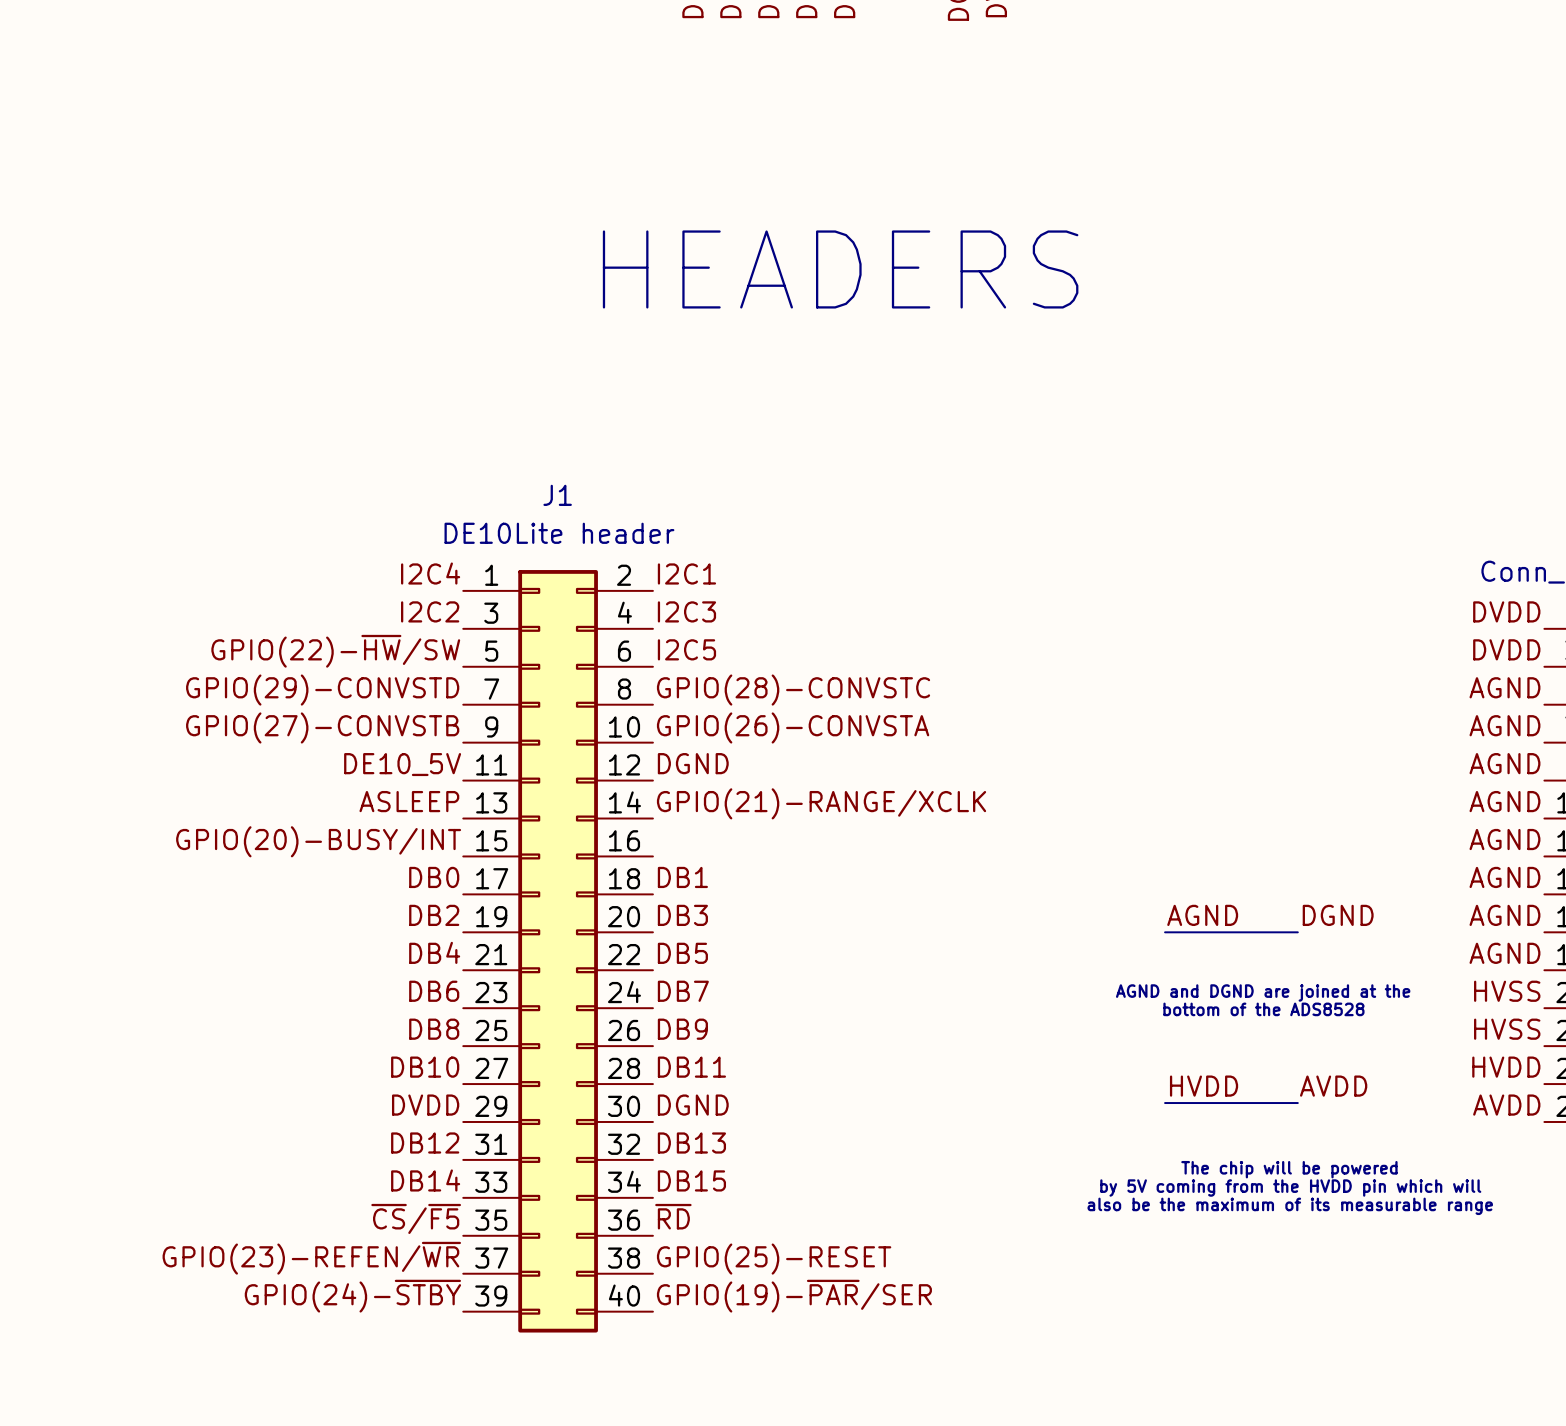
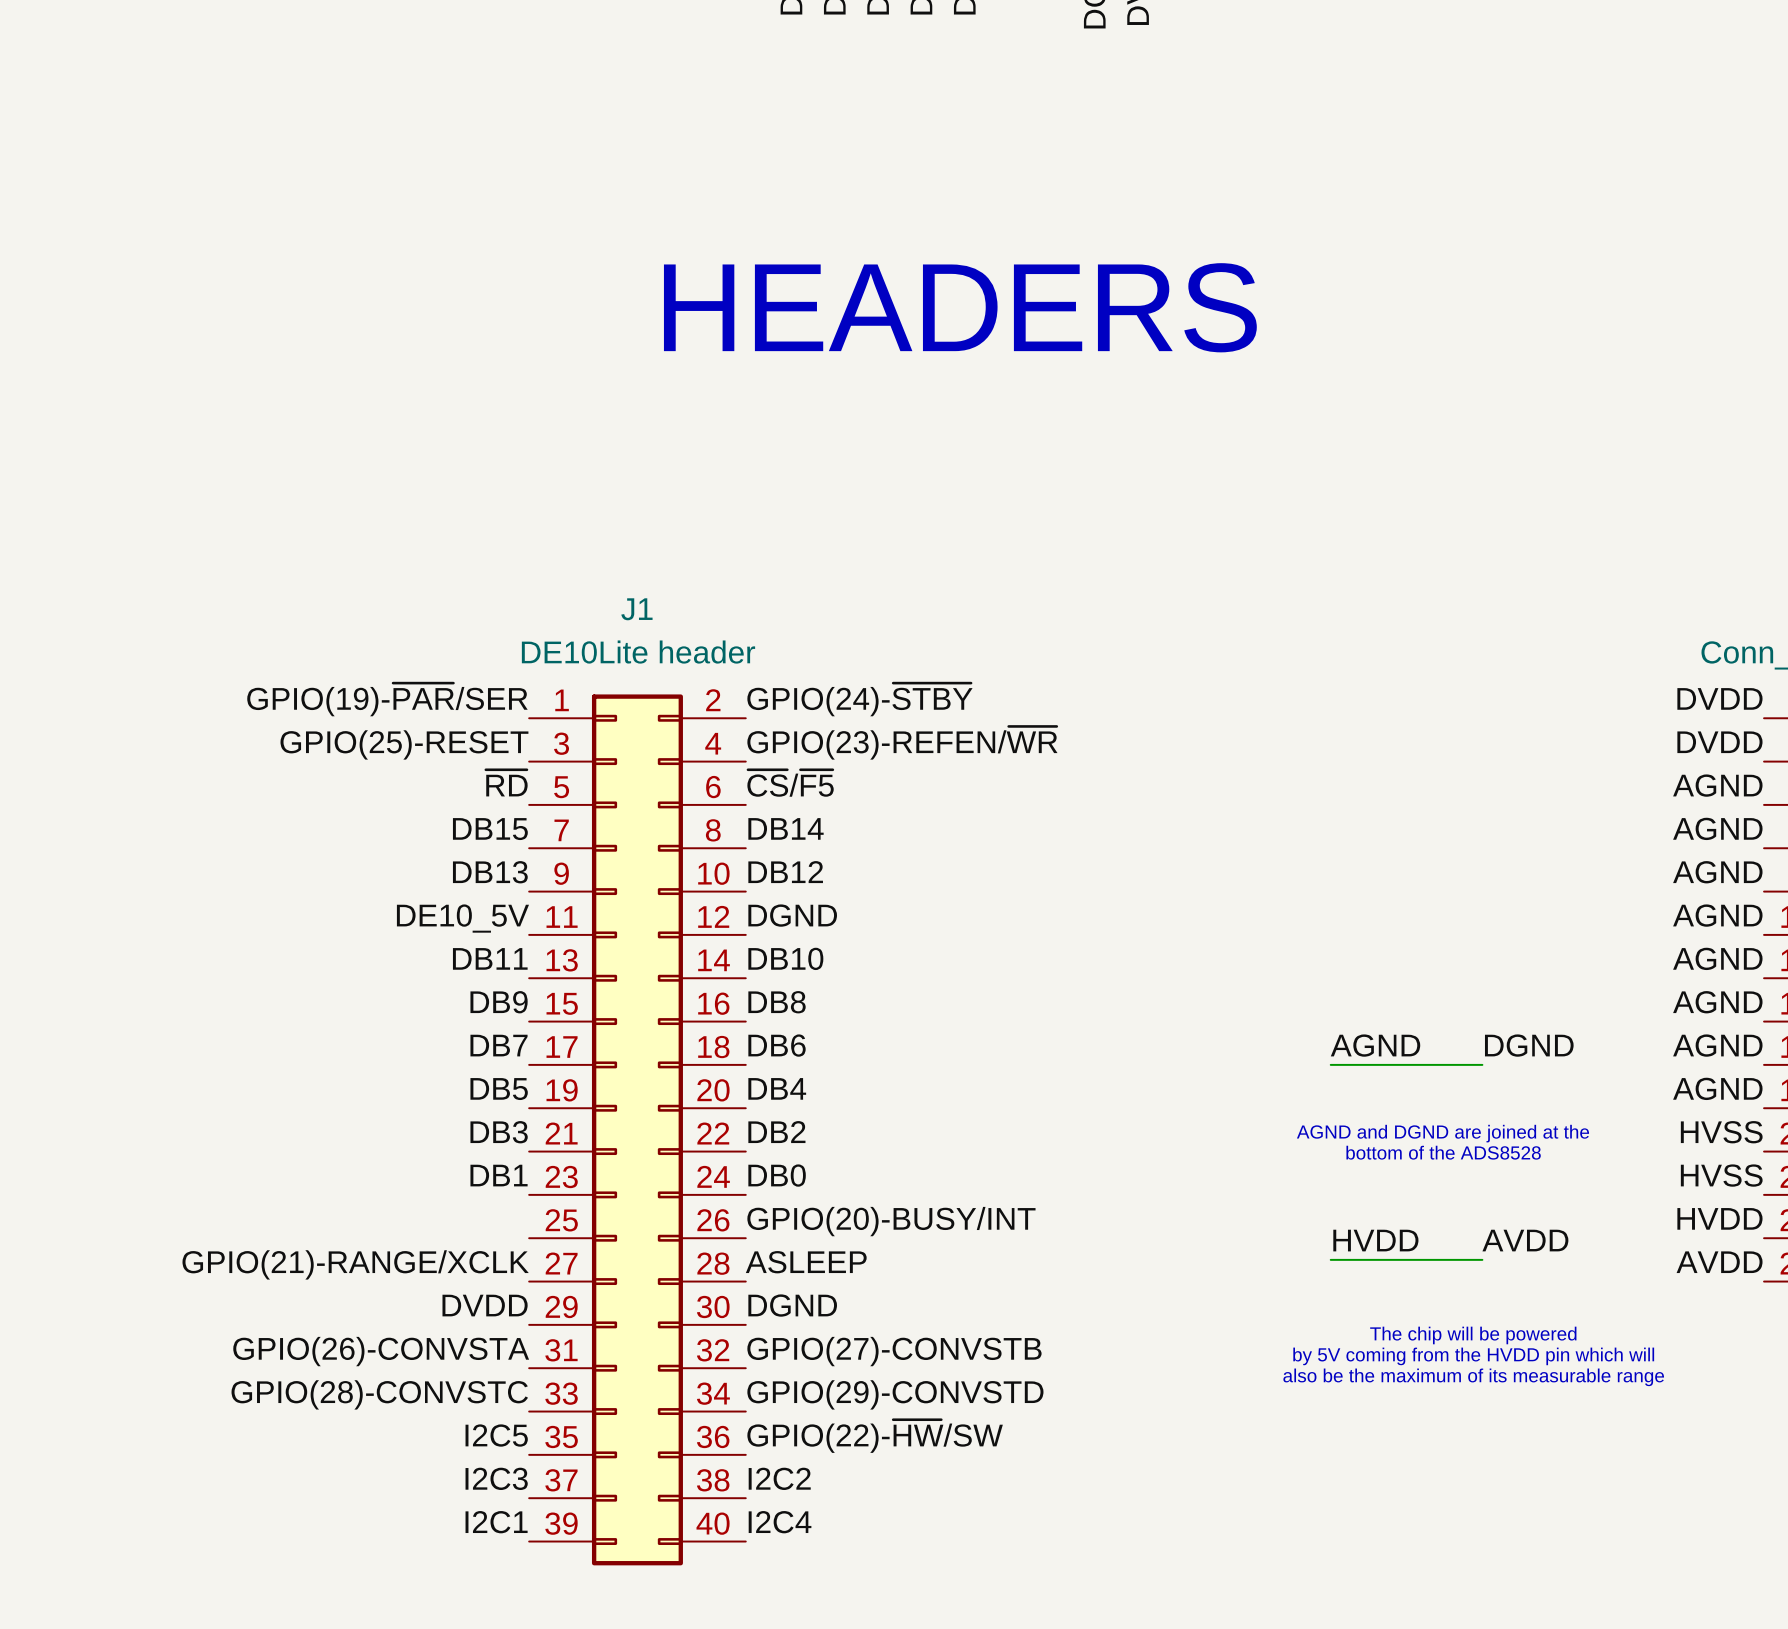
label: I2C4 (430, 573) -> none
label: I2C1 (686, 573) -> none
label: I2C2 (430, 611) -> GPIO(19)-~{PAR}/SER (387, 699)
label: I2C3 (686, 611) -> GPIO(24)-~{STBY} (859, 699)
label: I2C5 (686, 649) -> GPIO(23)-REFEN/~{WR} (902, 743)
label: GPIO(22)-~{HW}/SW (335, 651) -> GPIO(25)-RESET (404, 744)
label: GPIO(29)-CONVSTD (322, 690) -> ~{RD} (506, 783)
label: GPIO(28)-CONVSTC (793, 690) -> ~{CS}/~{F5} (790, 783)
label: GPIO(27)-CONVSTB (322, 727) -> DB15 (490, 829)
label: GPIO(26)-CONVSTA (793, 727) -> DB14 (786, 828)
label: DGND (693, 763) -> DB12 (785, 872)
label: DE10_5V (402, 764) -> DB13 (490, 872)
label: ASLEEP (409, 801) -> DE10_5V (462, 918)
label: GPIO(21)-RANGE/XCLK (821, 803) -> DGND (792, 915)
label: GPIO(20)-BUSY/INT (318, 841) -> DB11 (490, 958)
label: DB0 (434, 877) -> DB9 (499, 1002)
label: DB1 (682, 877) -> DB8 (777, 1002)
label: DB2 (434, 915) -> DB7 (499, 1045)
label: DB3 (682, 915) -> DB6 (777, 1045)
J1 position: (558, 951) -> (637, 1129)
label: DB4 (434, 952) -> DB5 (499, 1089)
label: DB5 (682, 953) -> DB4 (777, 1088)
label: DB6 (434, 991) -> DB3 (499, 1132)
label: DB7 (683, 991) -> DB2 (776, 1132)
label: DB8 (434, 1029) -> DB1 (499, 1175)
label: DB9 (682, 1029) -> DB0 (777, 1175)
label position: DB10 (425, 1067) -> DB10 (785, 958)
label: DB11 (691, 1067) -> GPIO(20)-BUSY/INT (891, 1221)
label: DVDD (425, 1105) -> GPIO(21)-RANGE/XCLK (355, 1264)
label: DGND (693, 1105) -> ASLEEP (806, 1262)
label: DB12 (425, 1143) -> DVDD (485, 1305)
label: DB13 (691, 1143) -> DGND (792, 1305)
label: DB14 (425, 1180) -> GPIO(26)-CONVSTA (381, 1351)
label: DB15 (691, 1180) -> GPIO(27)-CONVSTB (894, 1351)
label: ~{RD} (673, 1216) -> GPIO(29)-CONVSTD (895, 1394)
label: ~{CS}/~{F5} (416, 1218) -> GPIO(28)-CONVSTC (379, 1394)
label: GPIO(23)-REFEN/~{WR} (311, 1258) -> I2C5 (496, 1435)
label: GPIO(25)-RESET (774, 1259) -> GPIO(22)-~{HW}/SW (875, 1436)
label: GPIO(24)-~{STBY} (352, 1296) -> I2C3 (496, 1478)
label: GPIO(19)-~{PAR}/SER (794, 1296) -> I2C2 (779, 1478)
label: none -> I2C1 (496, 1522)
label: none -> I2C4 (780, 1522)

